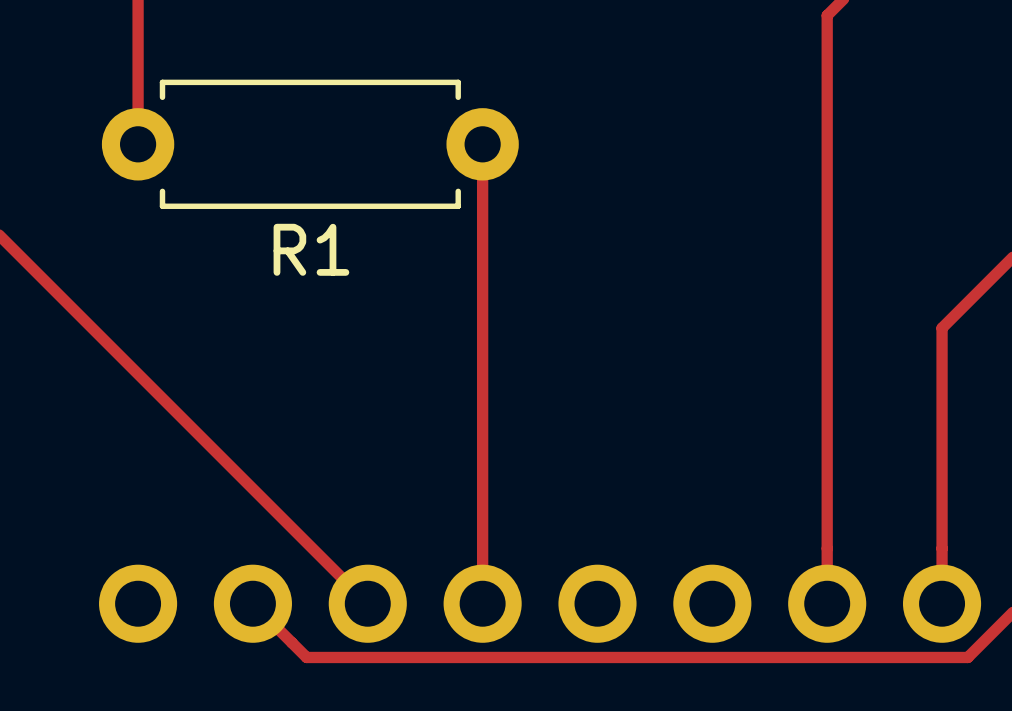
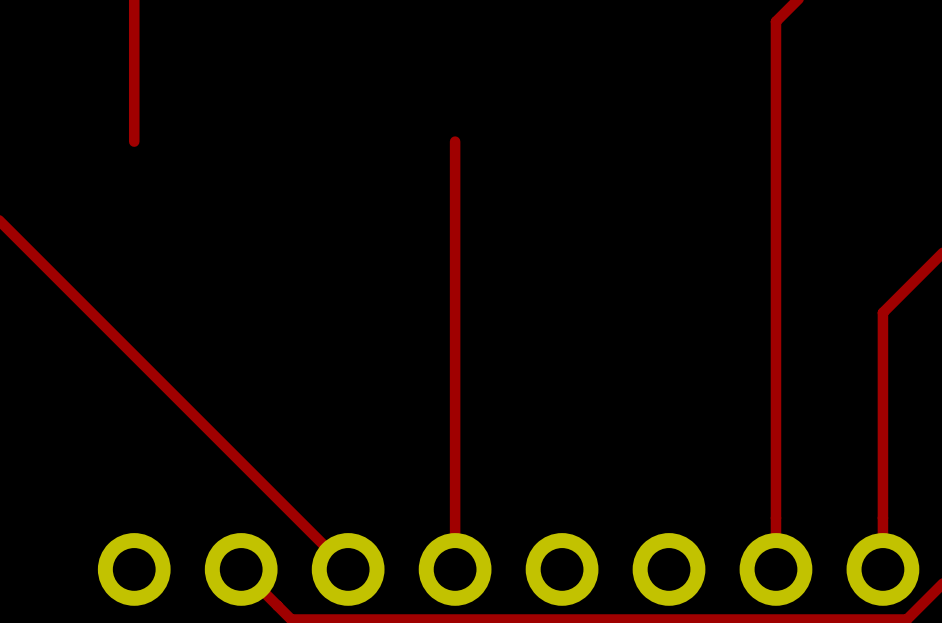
R1: (310, 144) -> none

